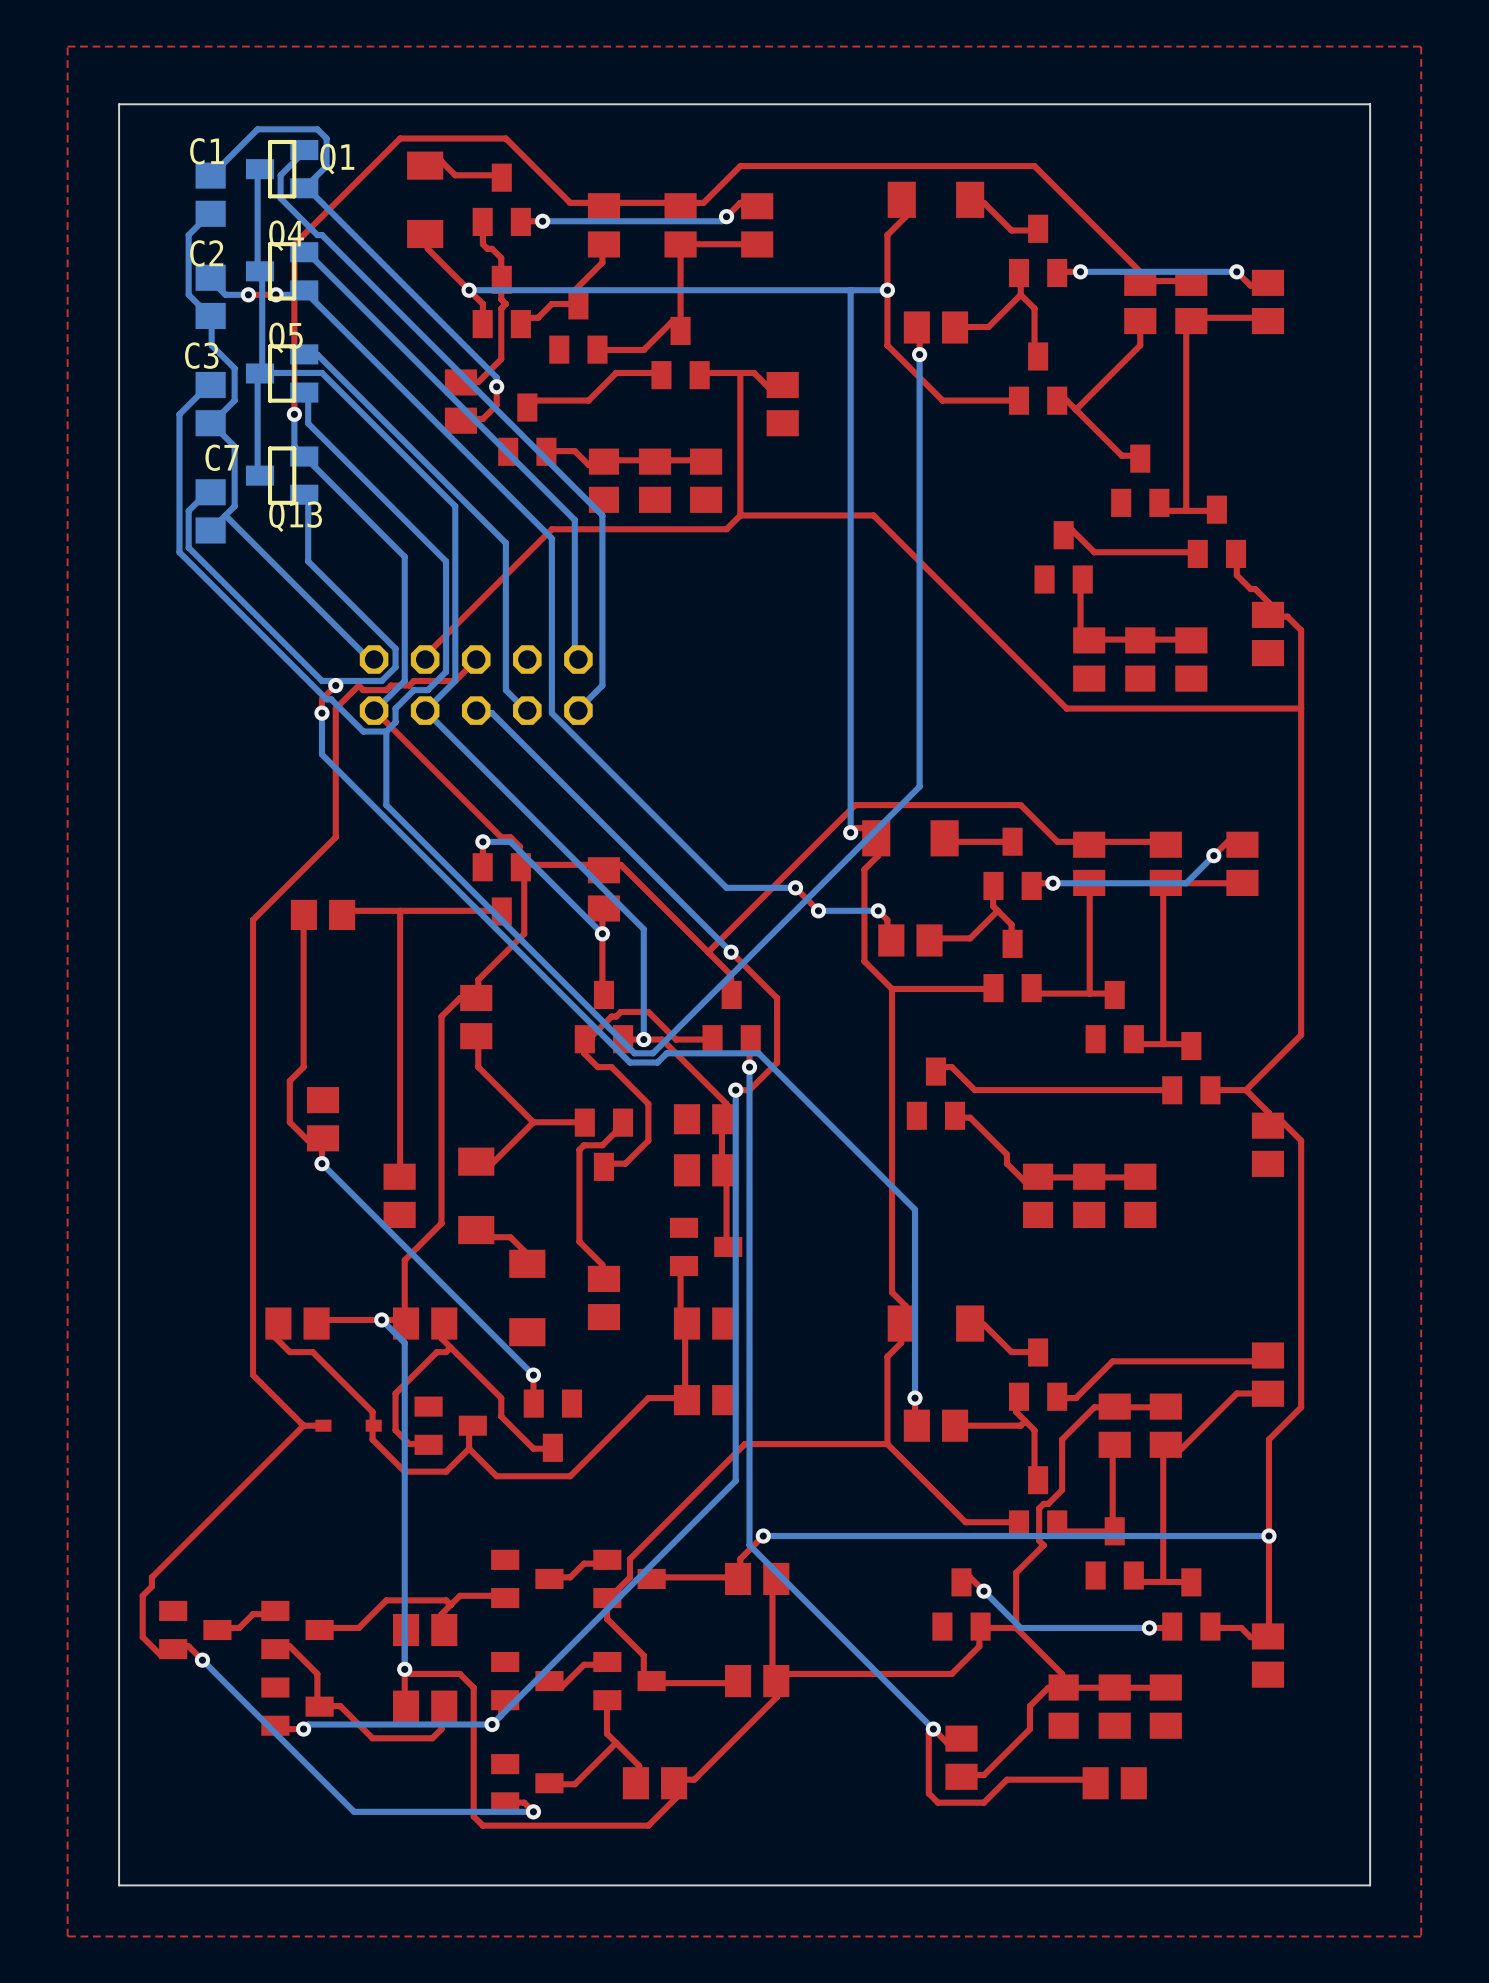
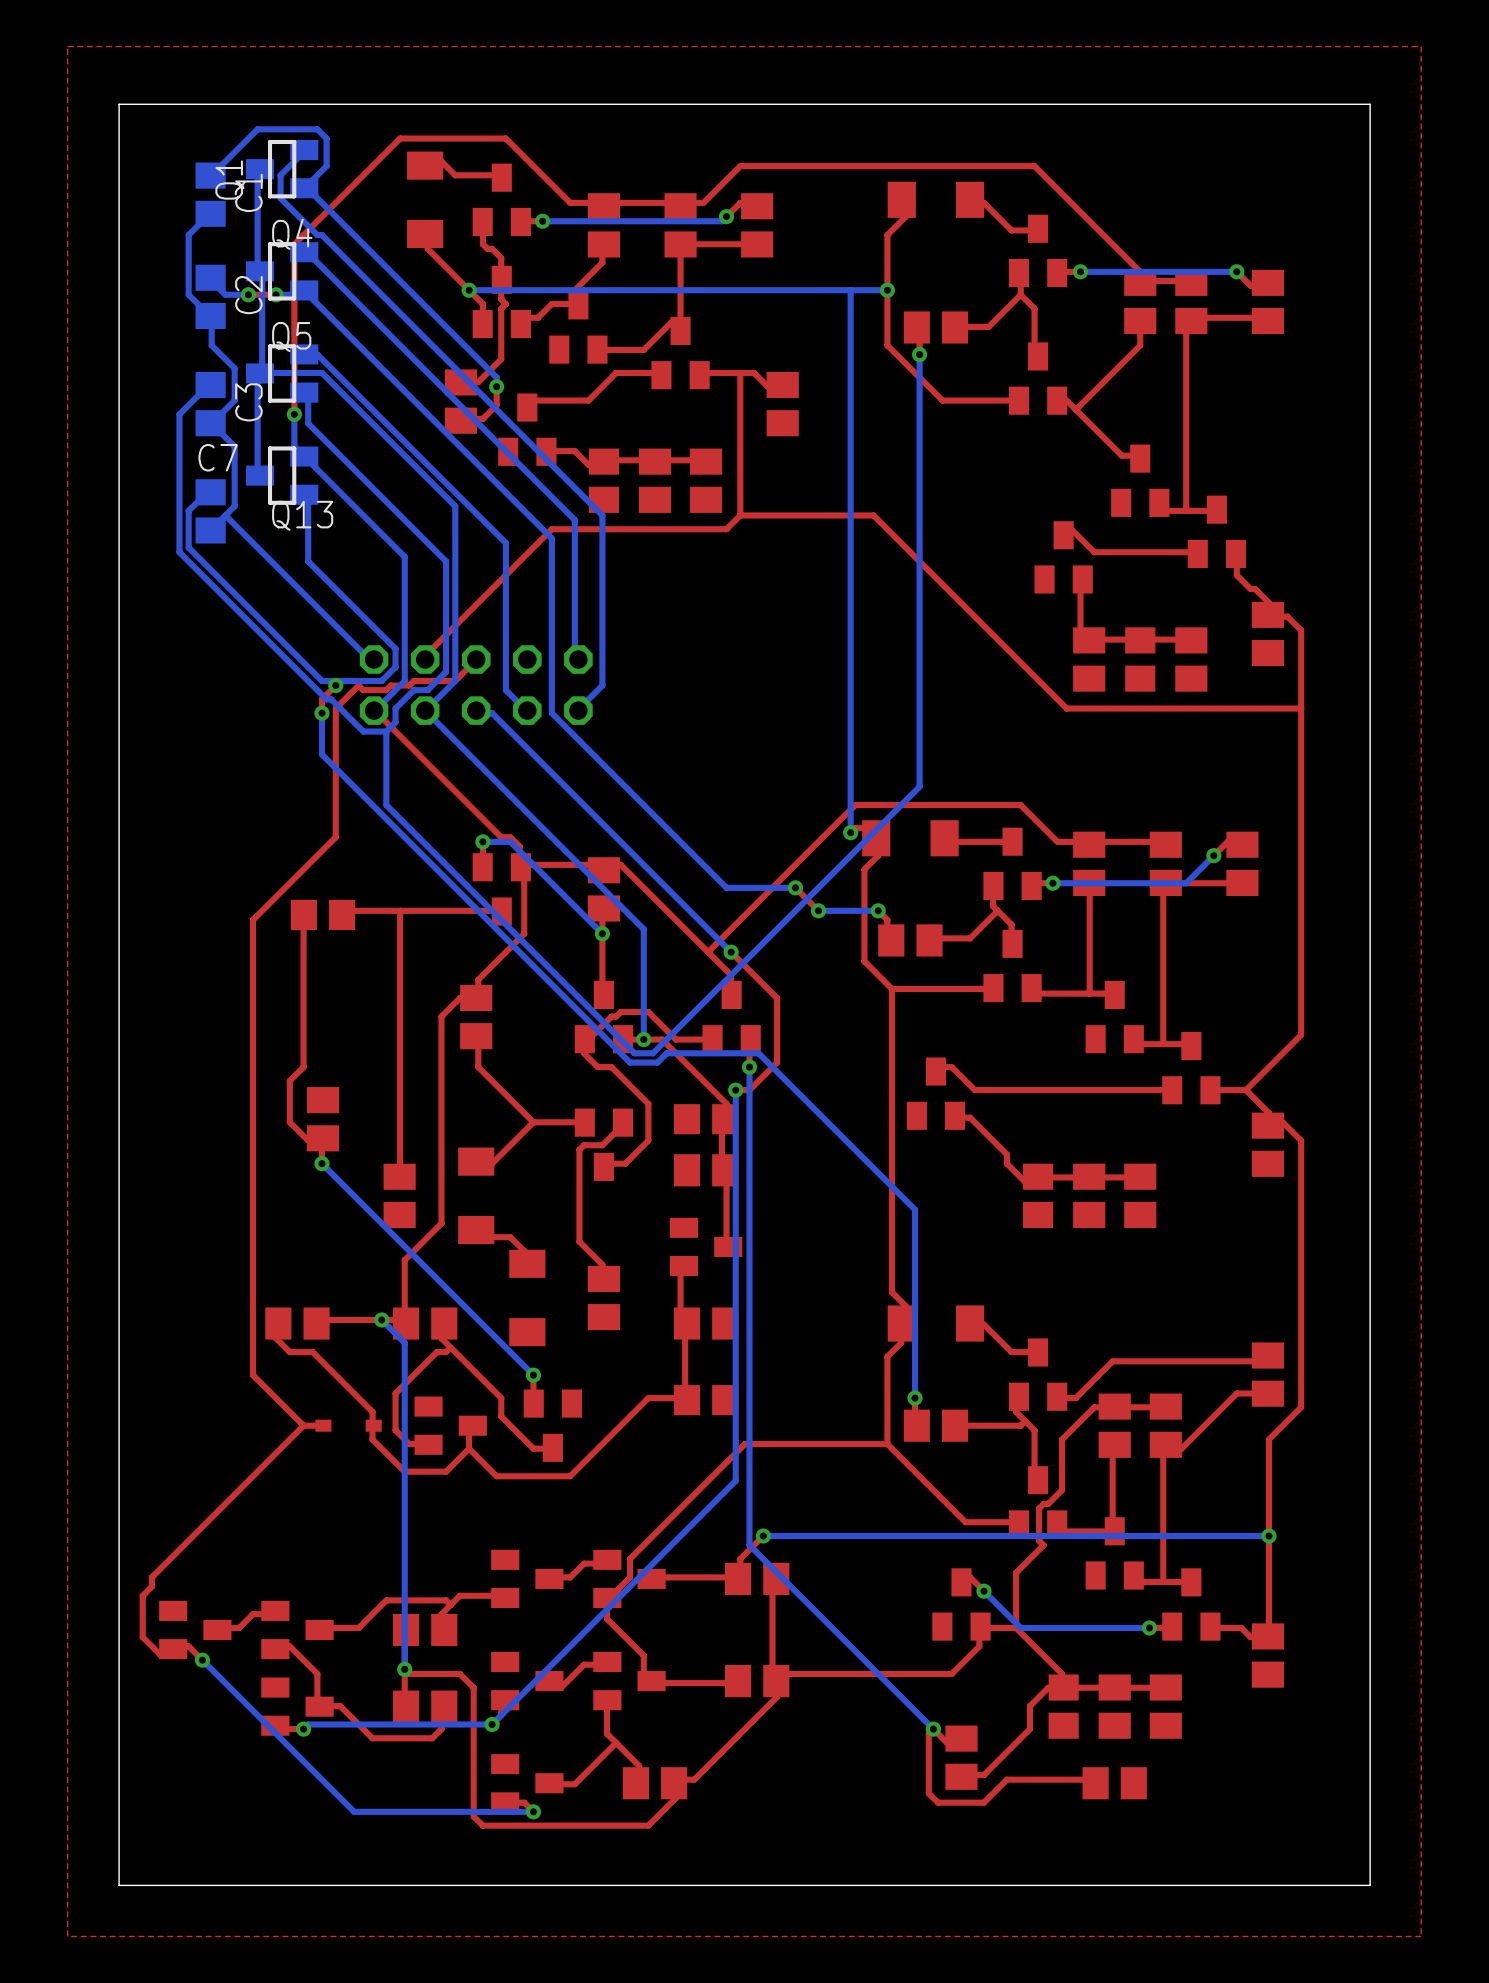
C1 name rotation: 0° (206, 151) -> 90° counterclockwise (248, 192)
C1 name position: C1 (206, 151) -> C1 (248, 192)
Q1 name rotation: 0° (337, 159) -> 90° counterclockwise (230, 180)
Q1 name position: Q1 (337, 159) -> Q1 (230, 180)
C2 name rotation: 0° (206, 253) -> 90° counterclockwise (248, 295)
C2 name position: C2 (206, 253) -> C2 (248, 295)
C3 name rotation: 0° (201, 355) -> 90° counterclockwise (248, 402)
C3 name position: C3 (201, 355) -> C3 (248, 402)

